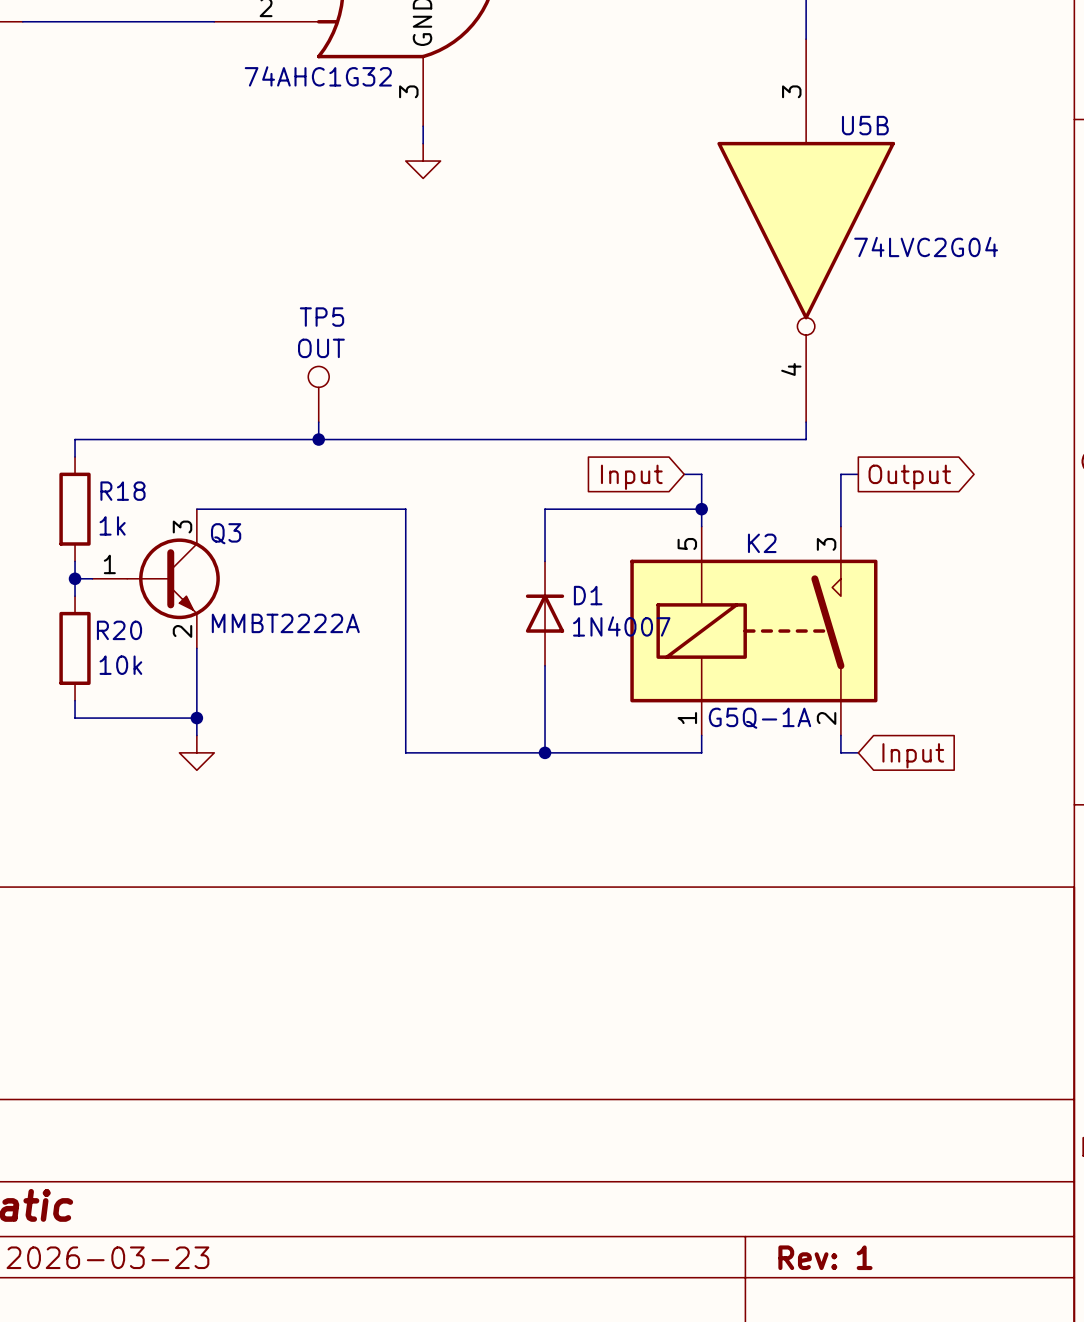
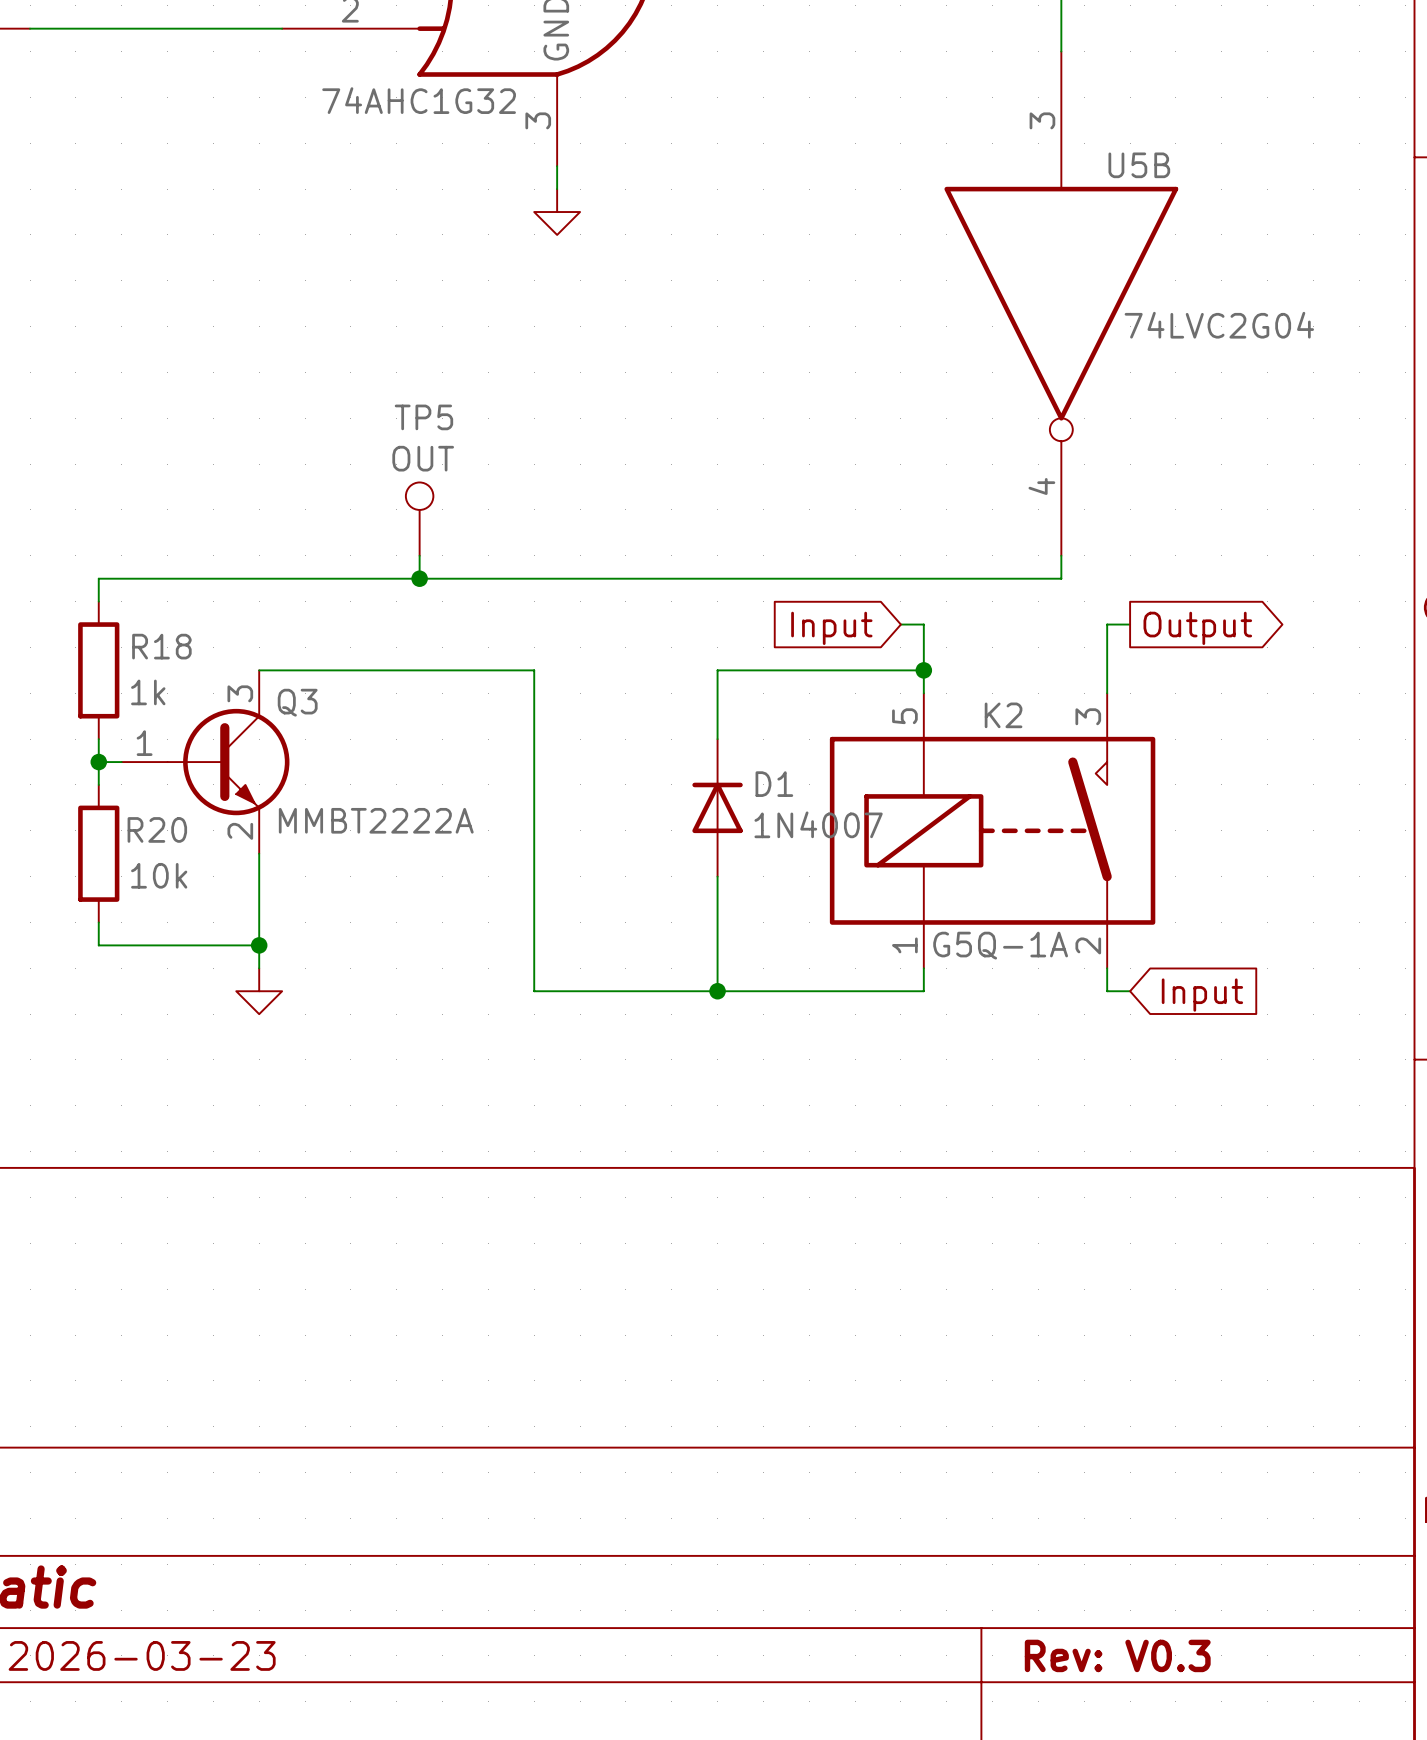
title block: Rev: 1 (825, 1257) -> Rev: V0.3 (1117, 1655)

